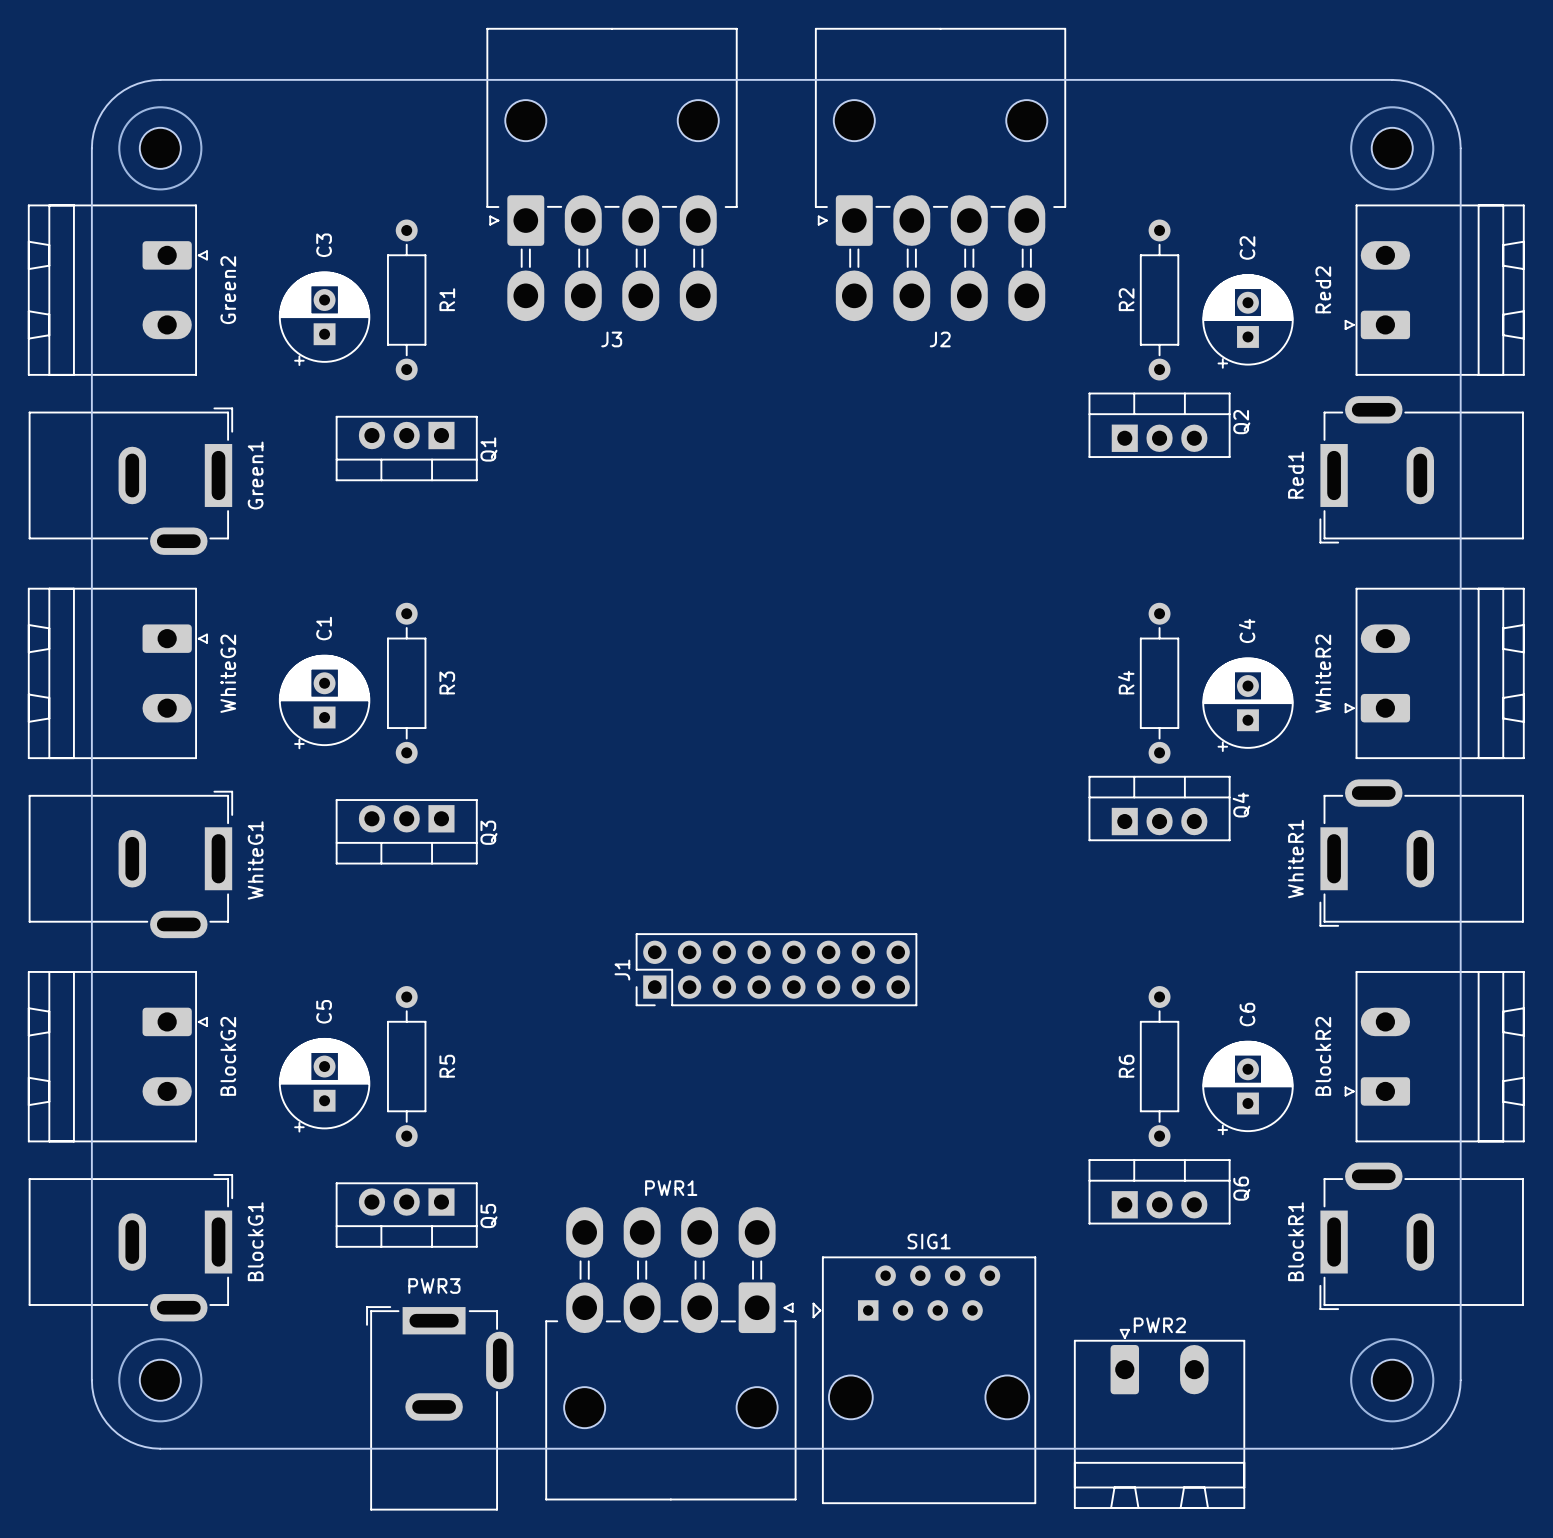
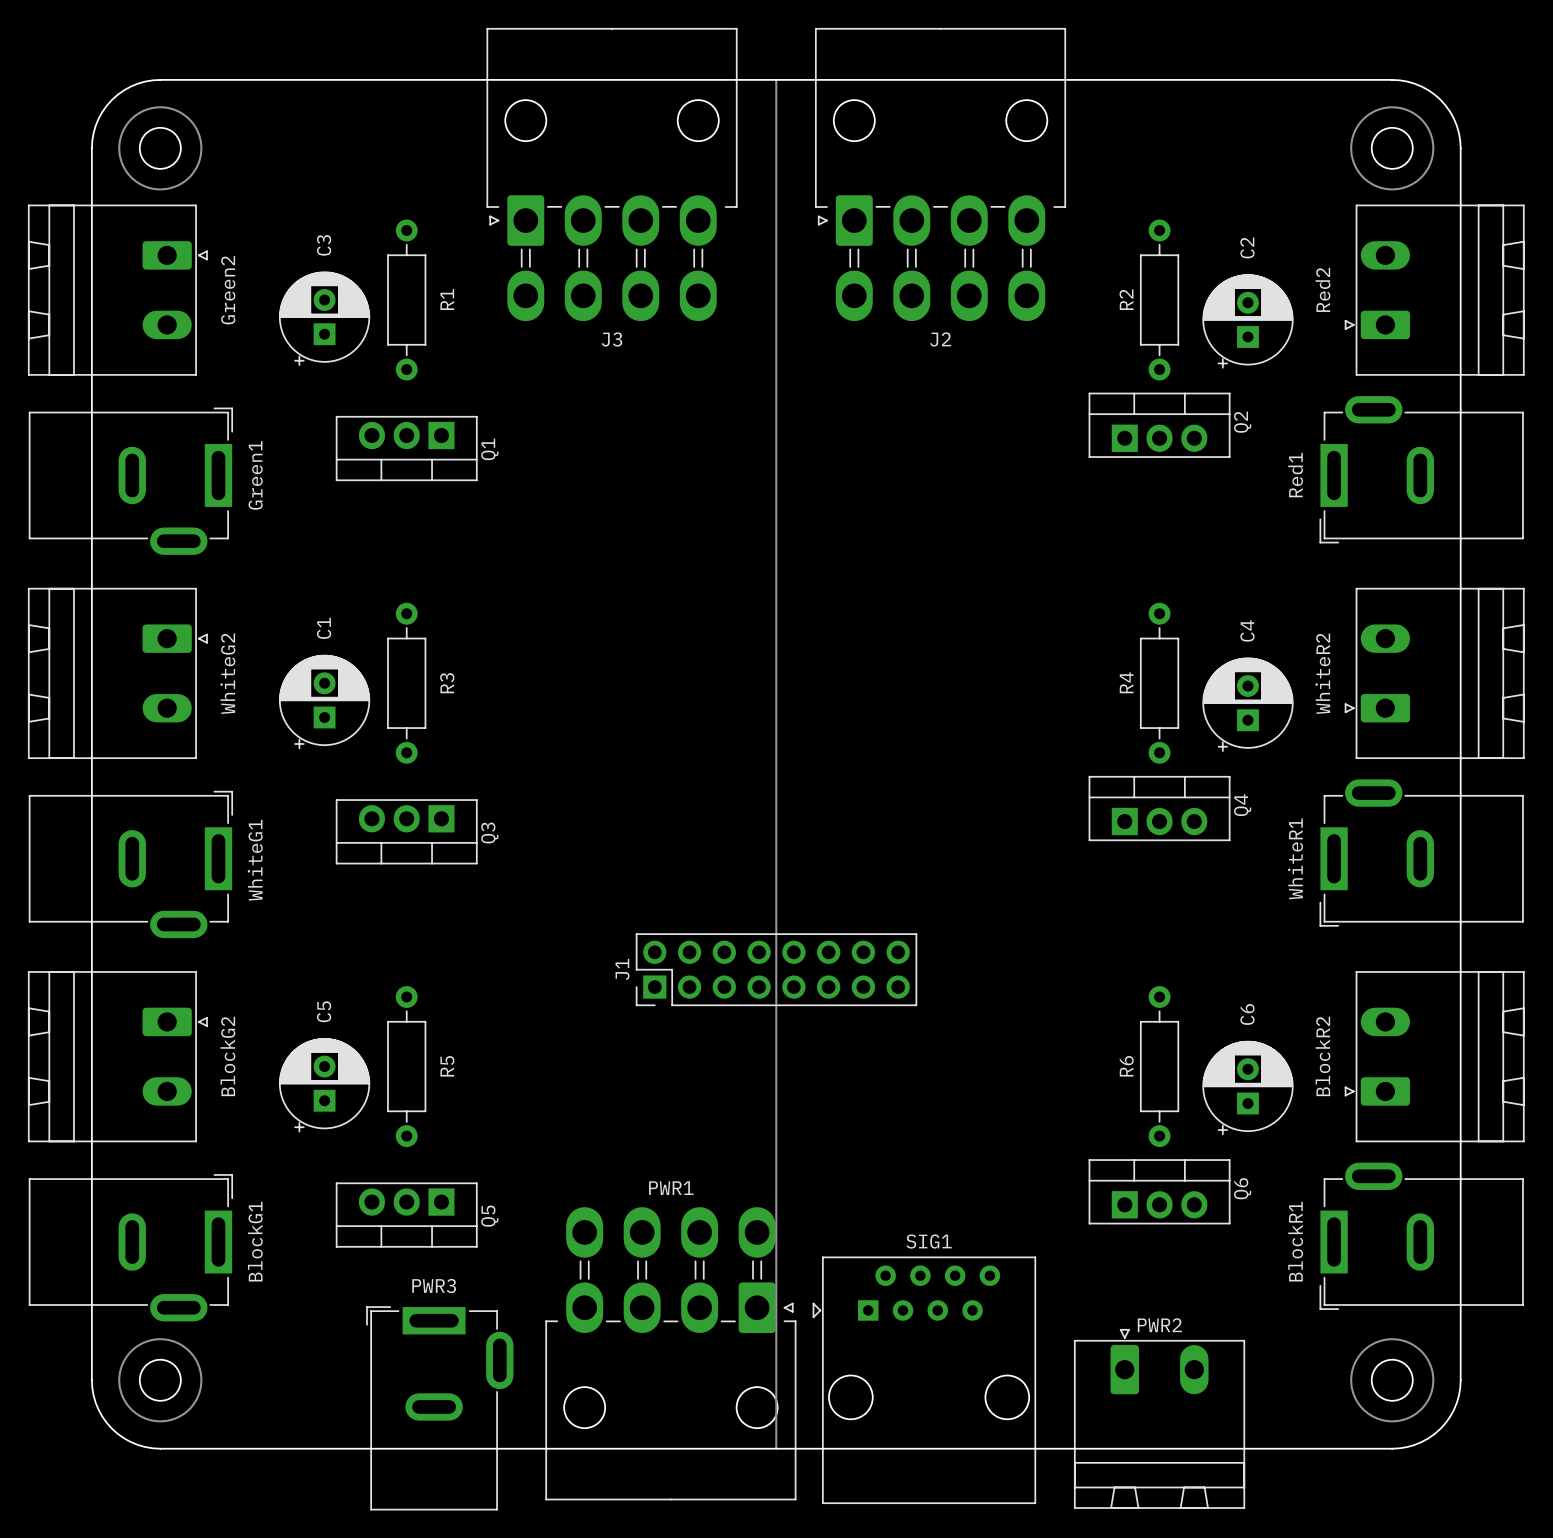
line: none -> (776, 79) (776, 1448)

